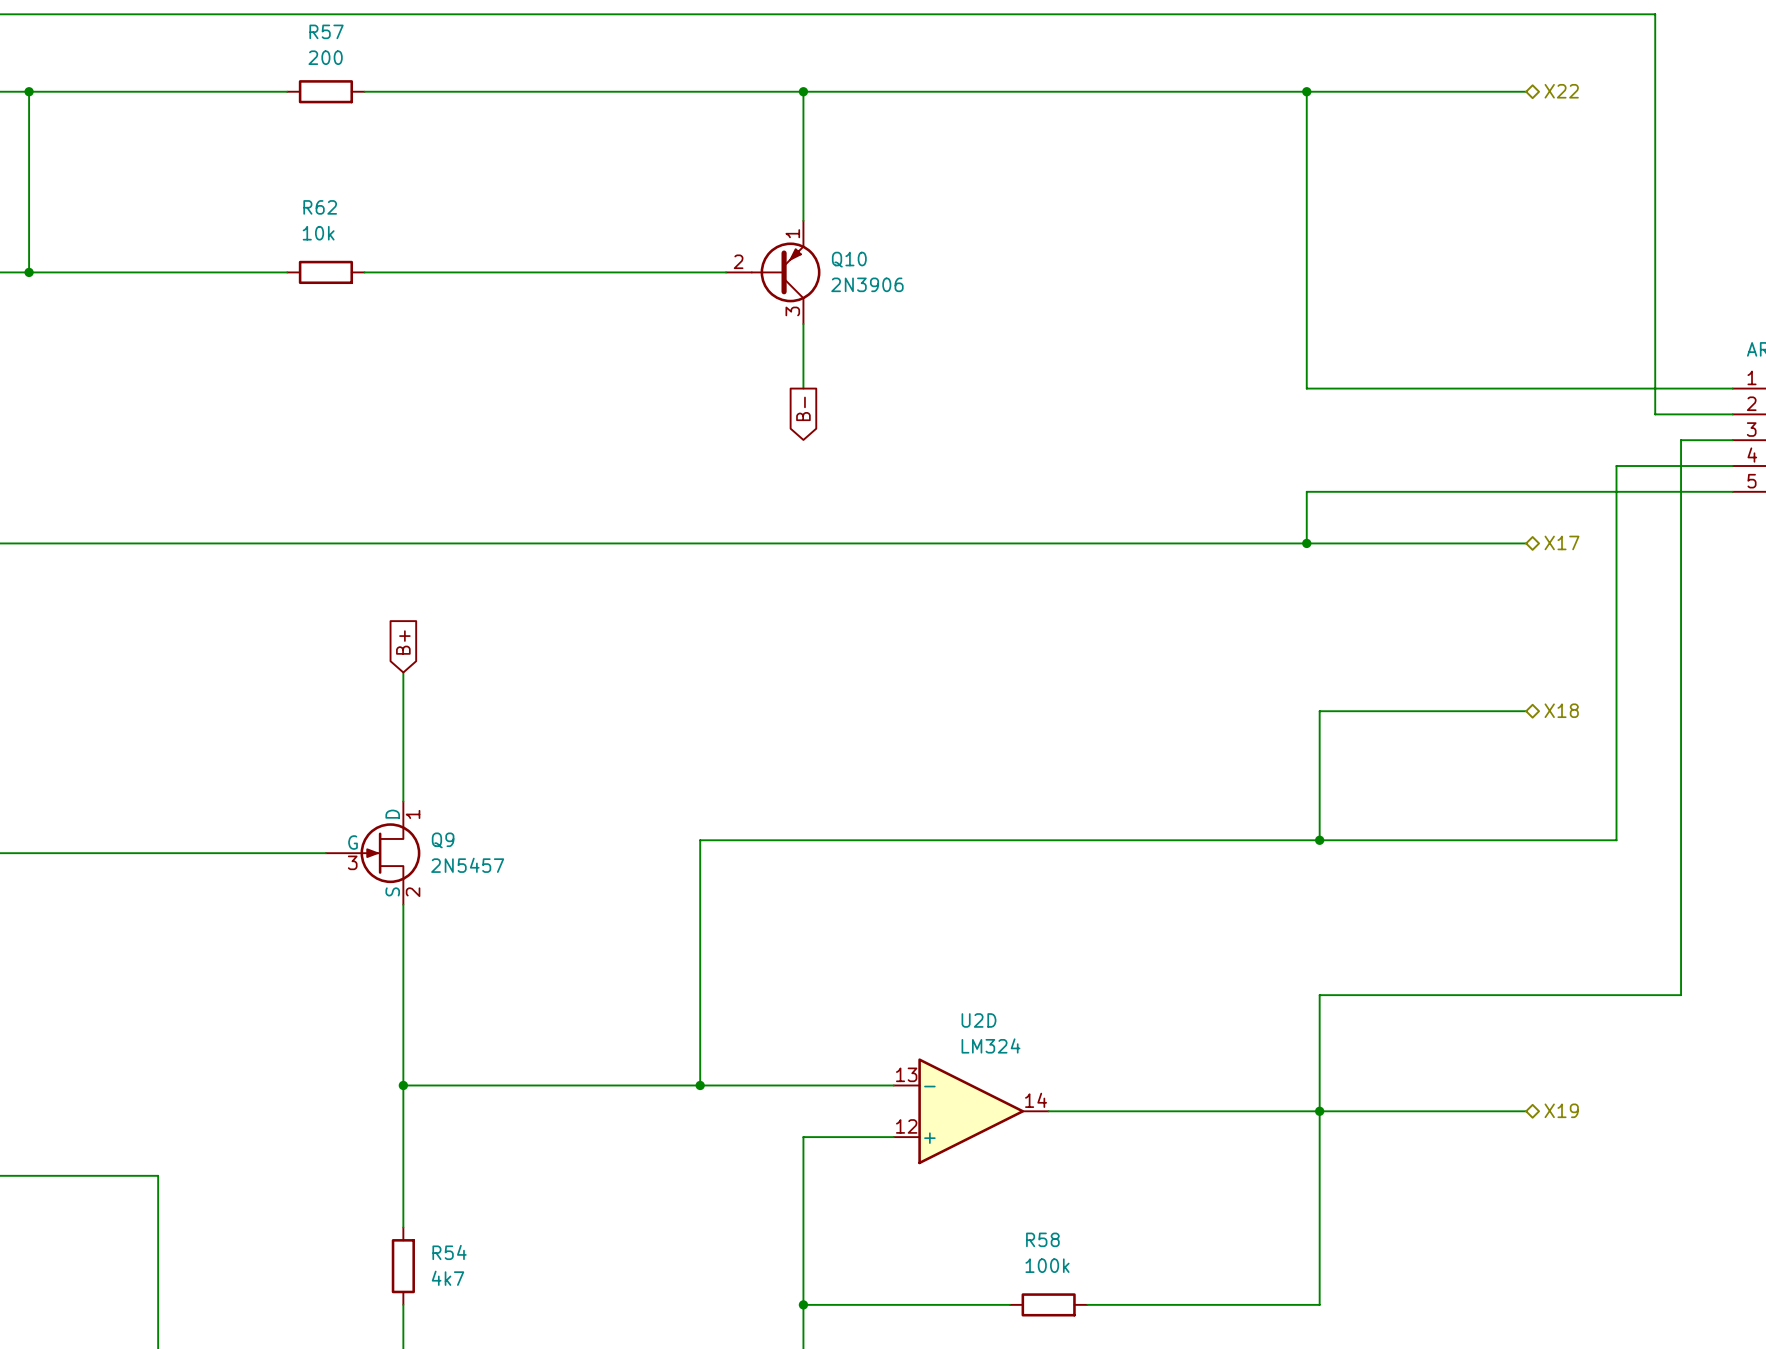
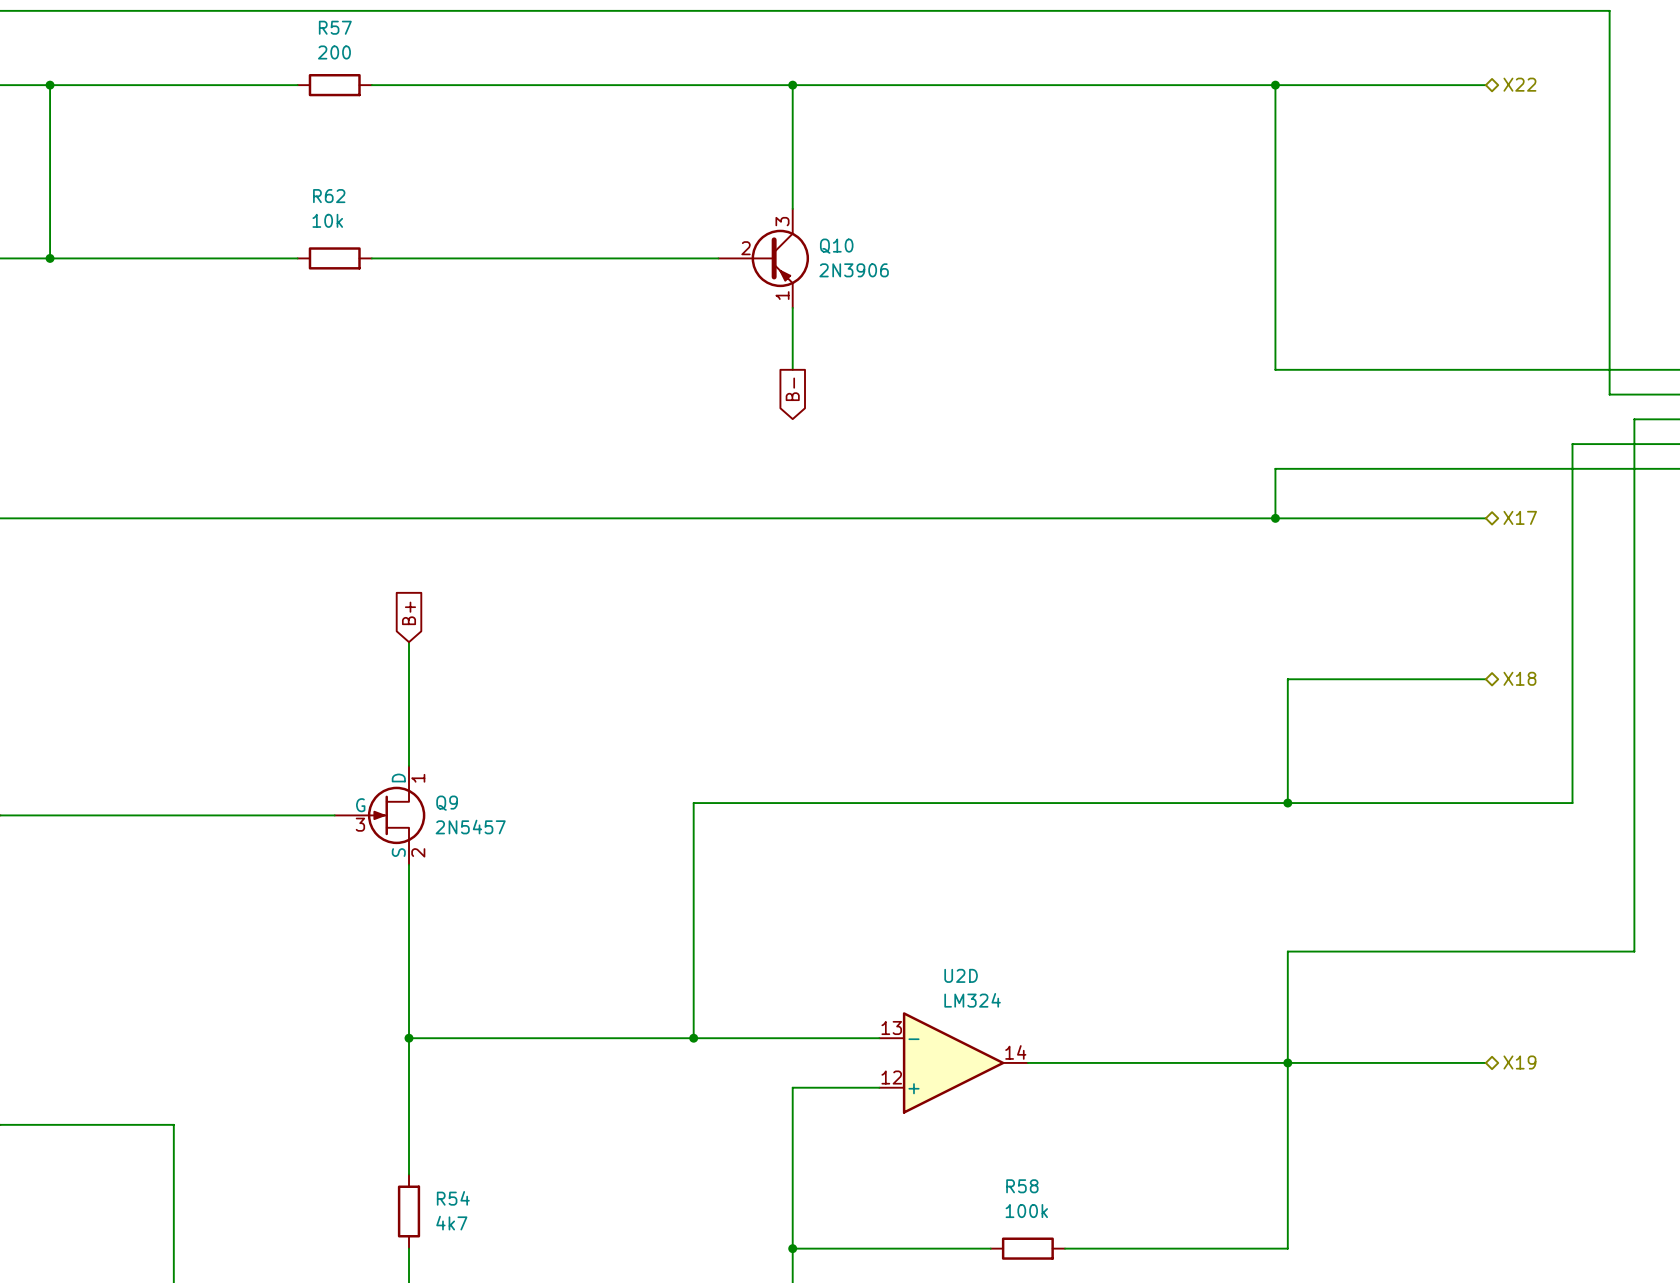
Q10 symbol: [726, 220, 821, 325] -> [718, 208, 810, 308]

